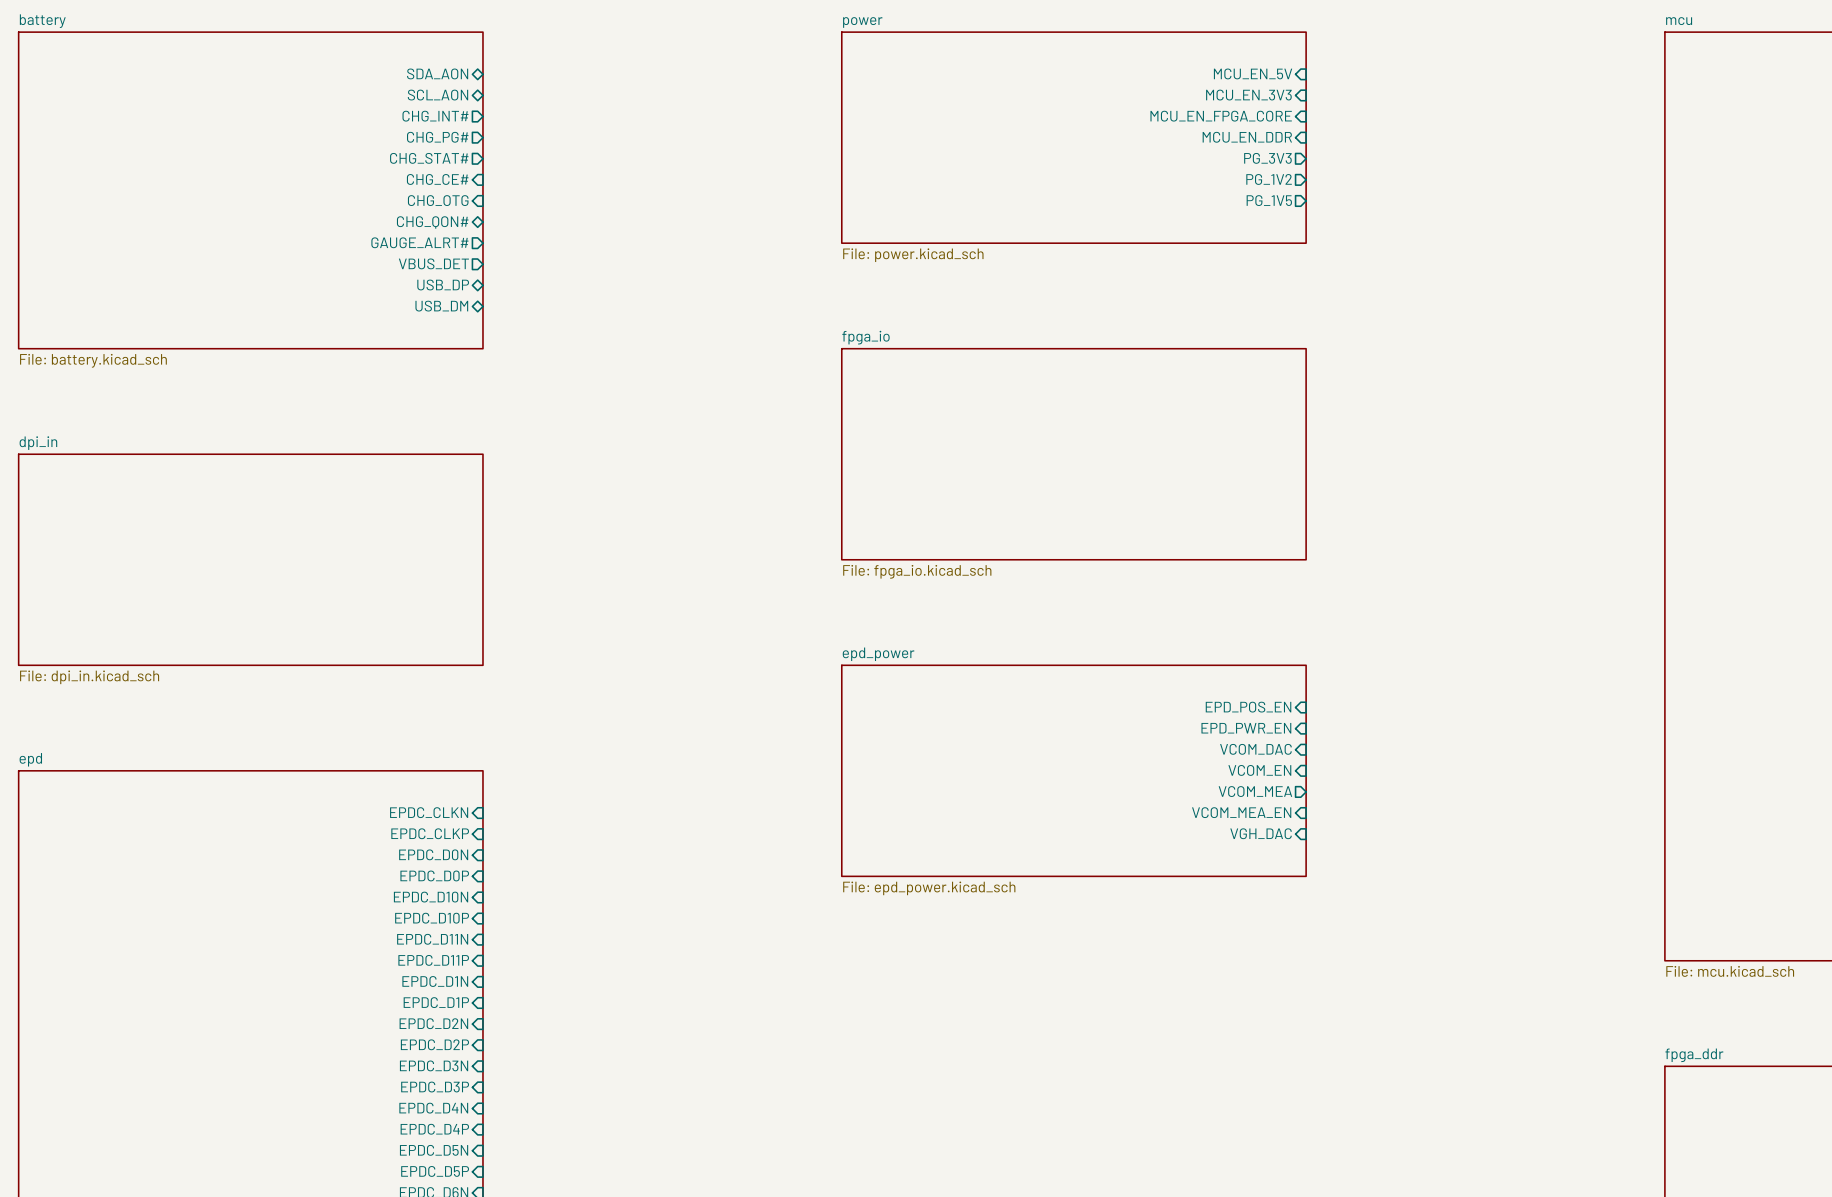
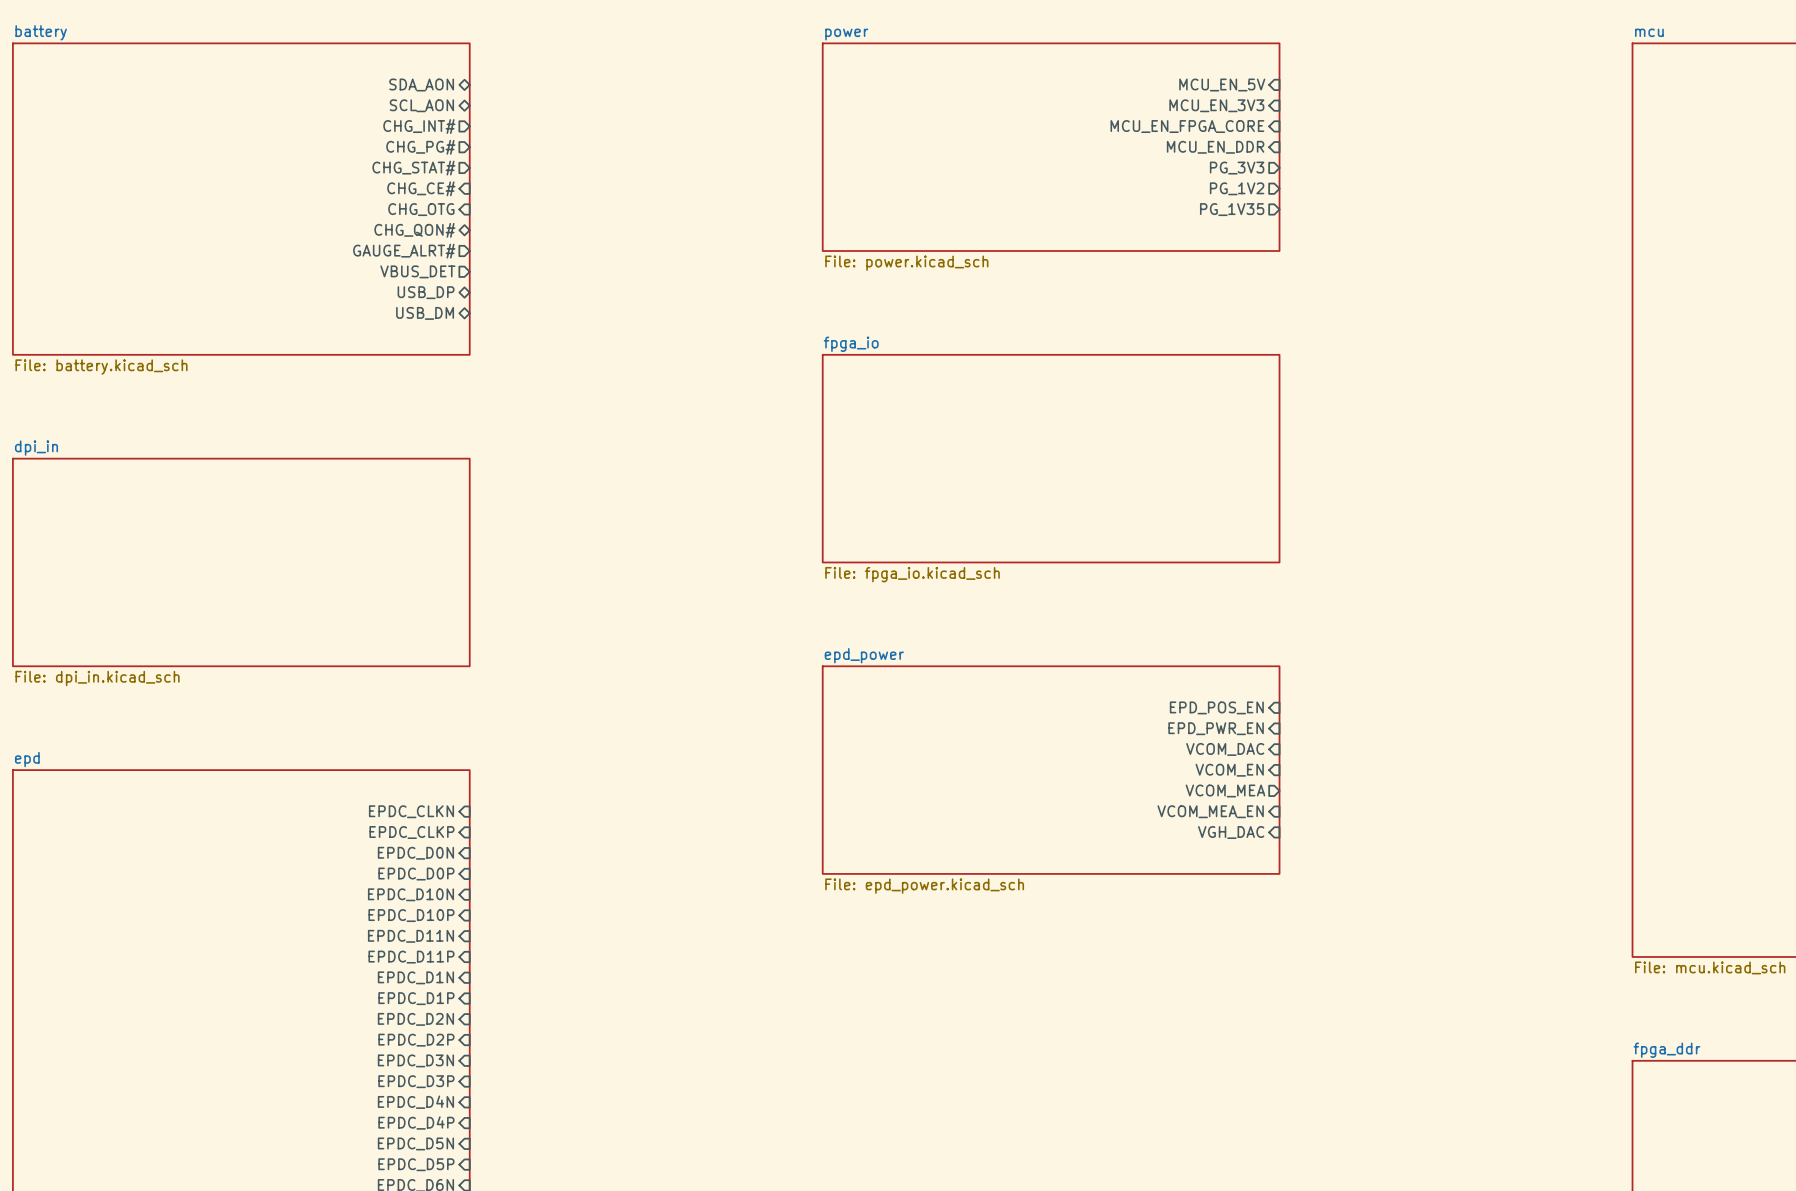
sheet pin: PG_1V5 (1269, 200) -> PG_1V35 (1232, 209)

